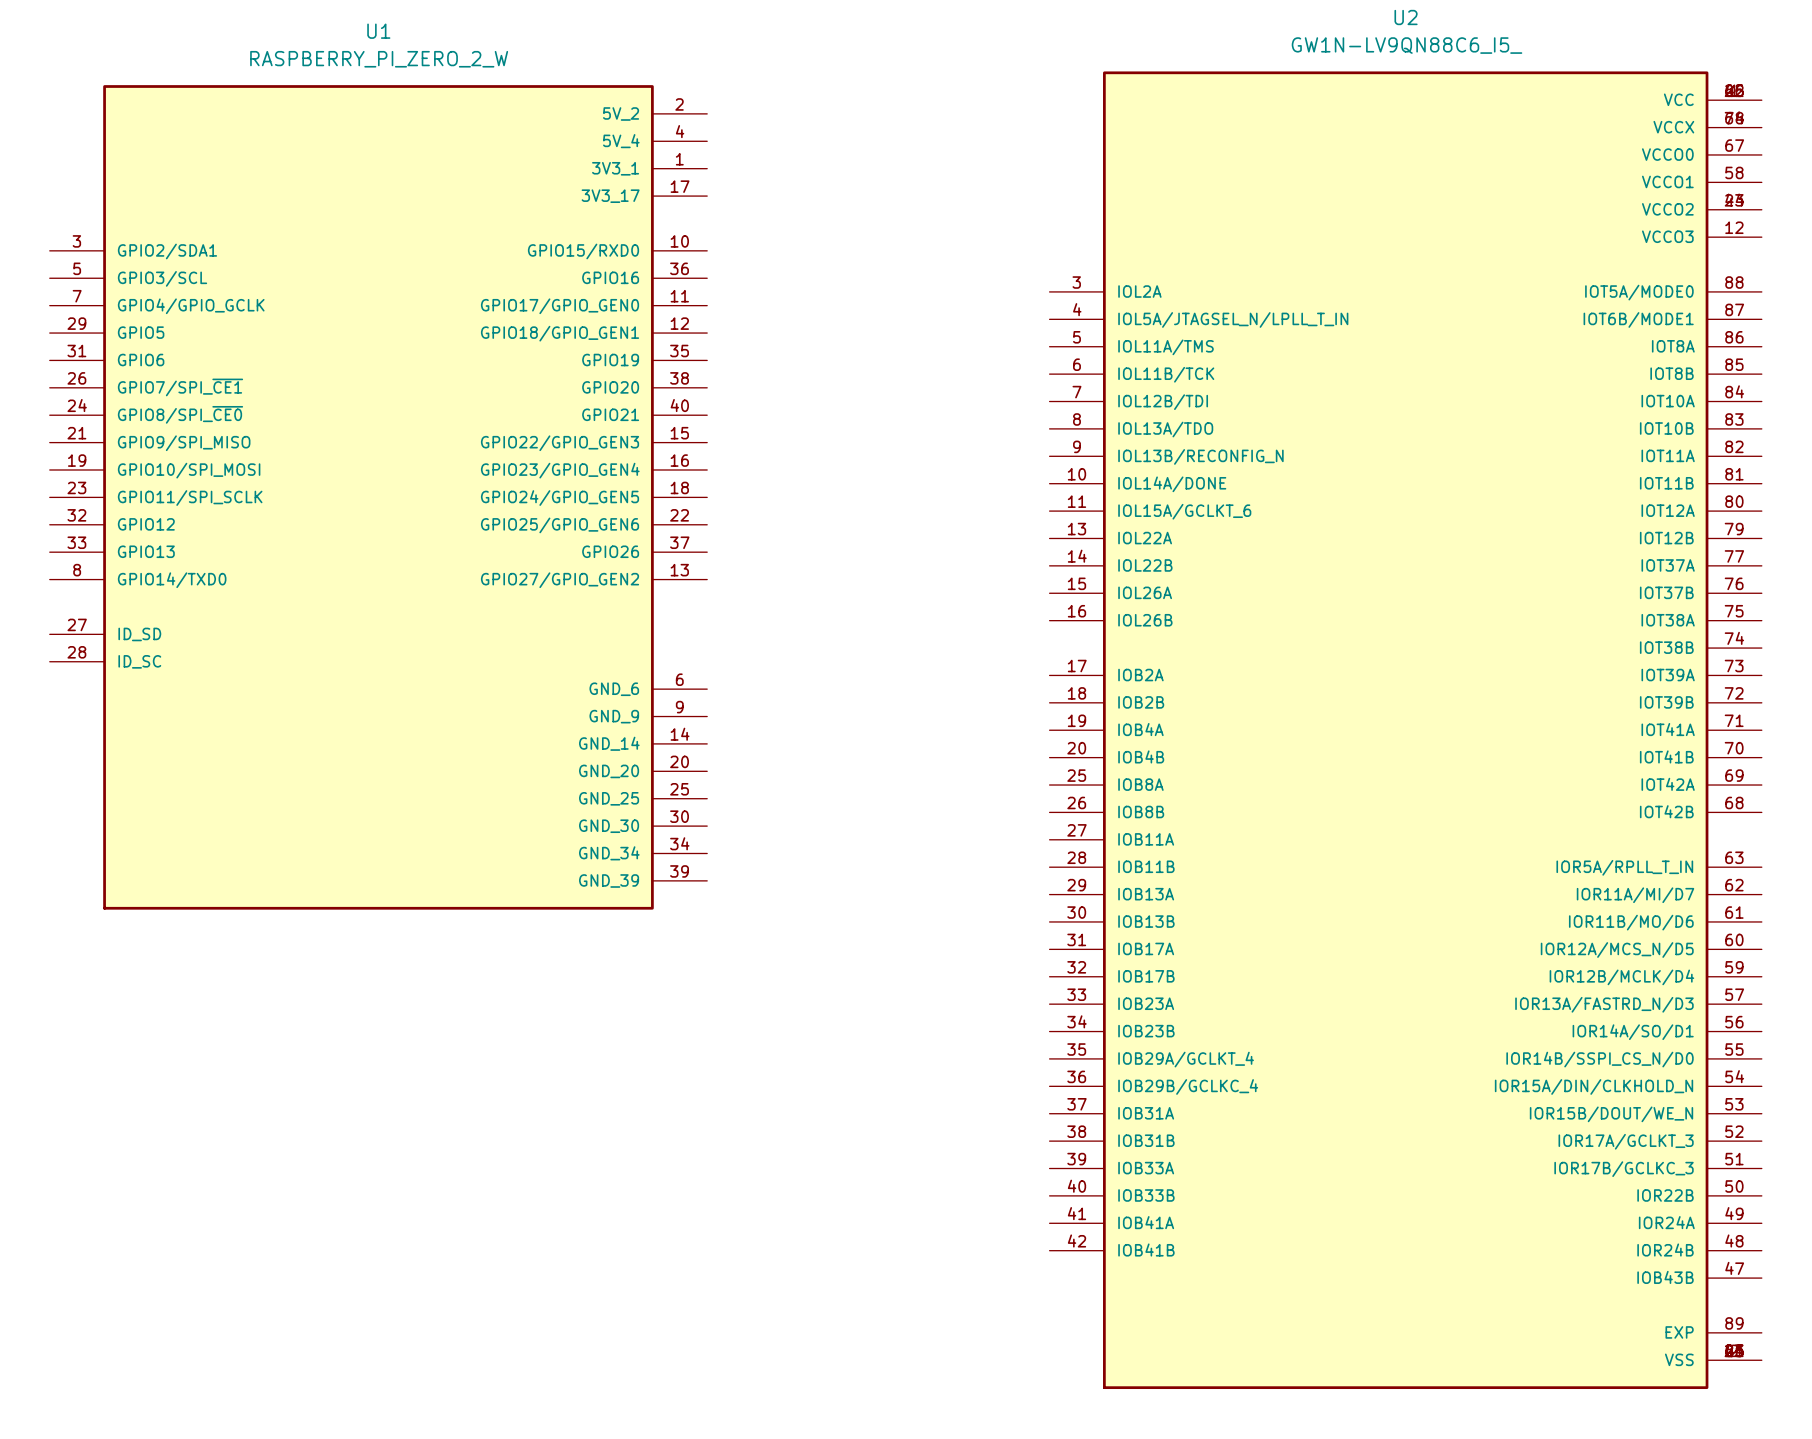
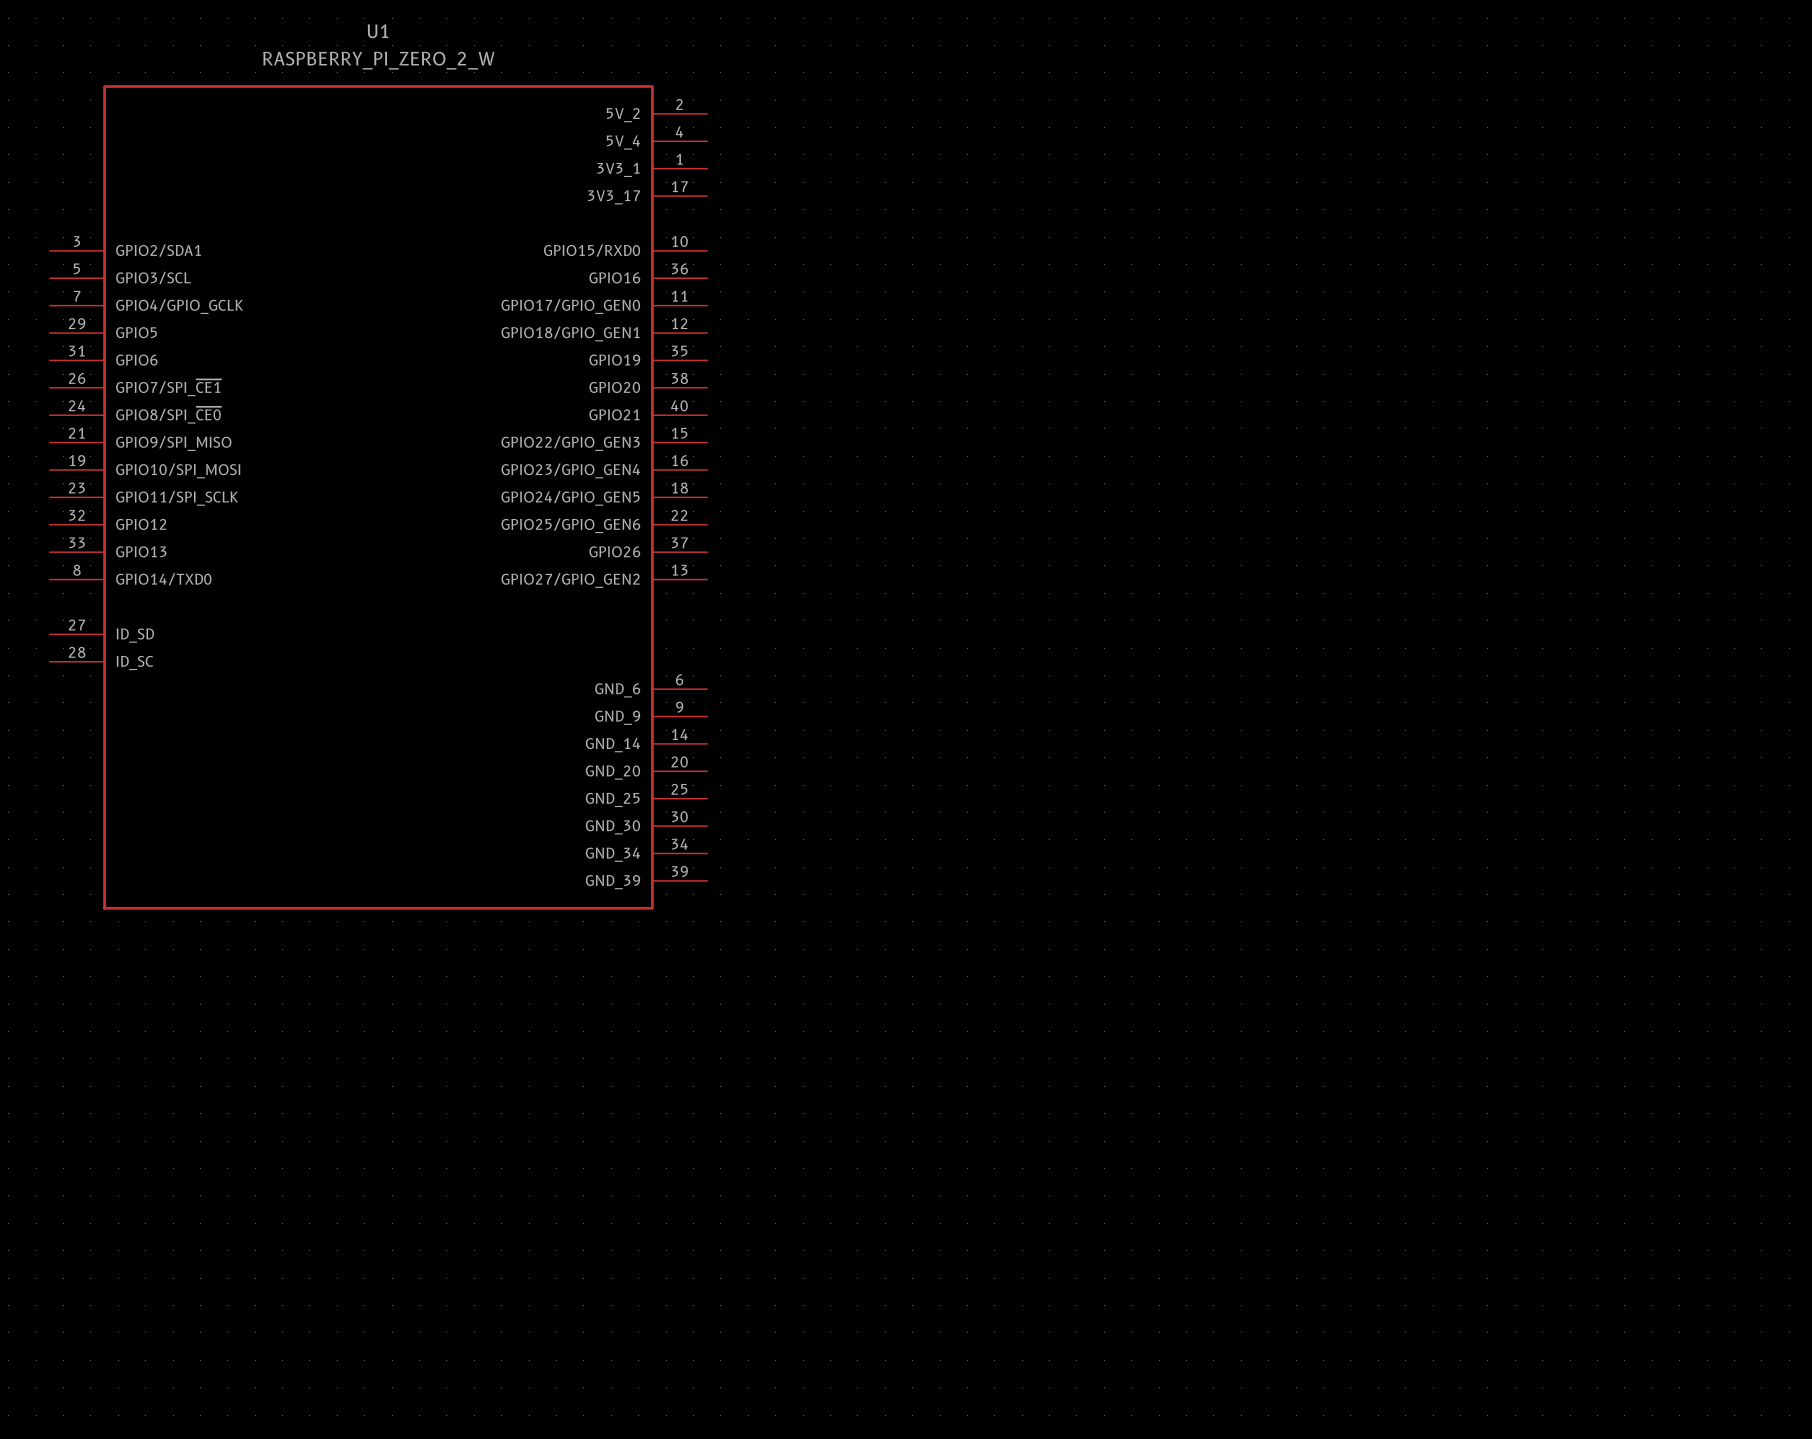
U2: GW1N-LV9QN88C6_I5_ (1405, 730) -> none

